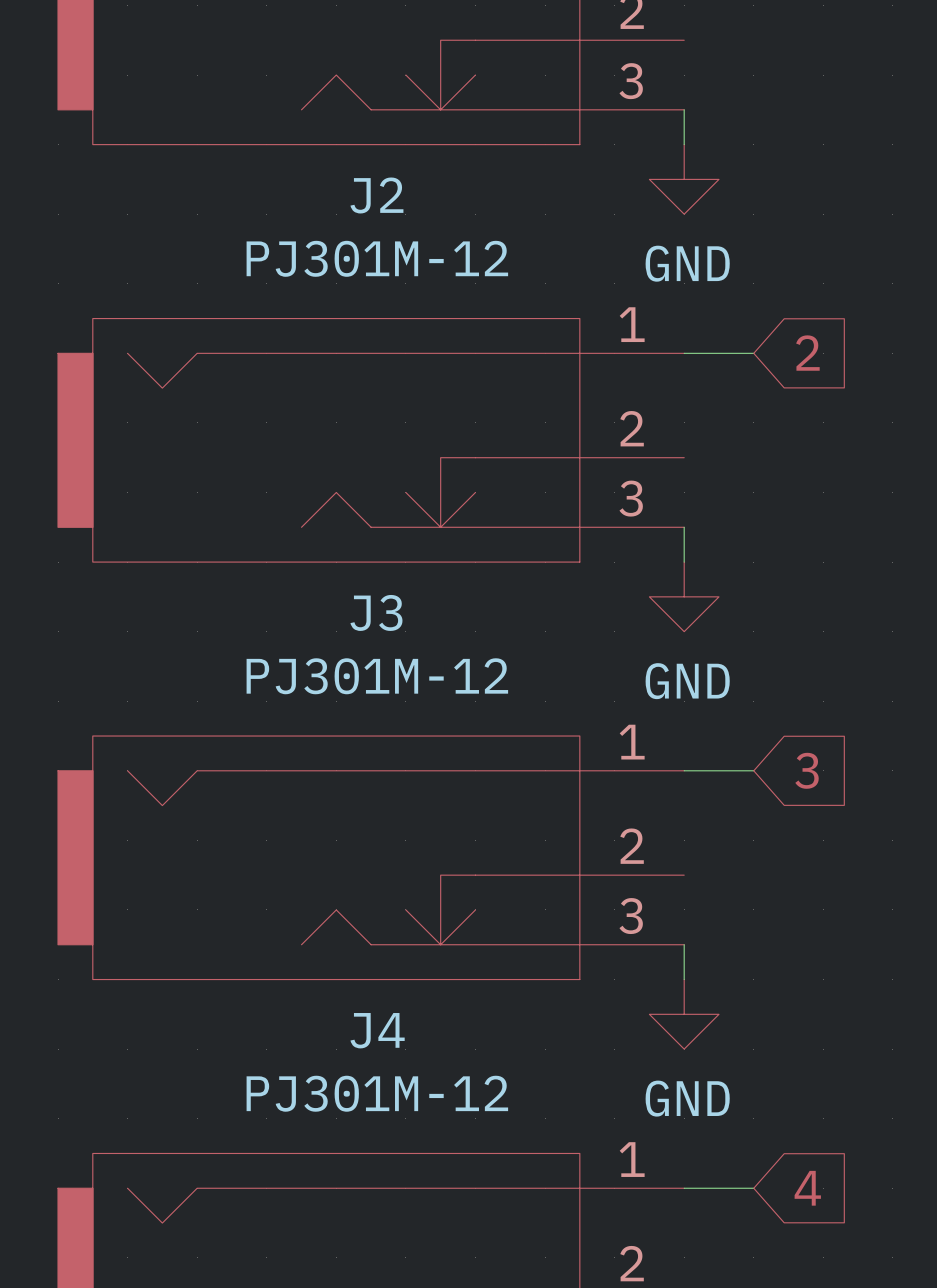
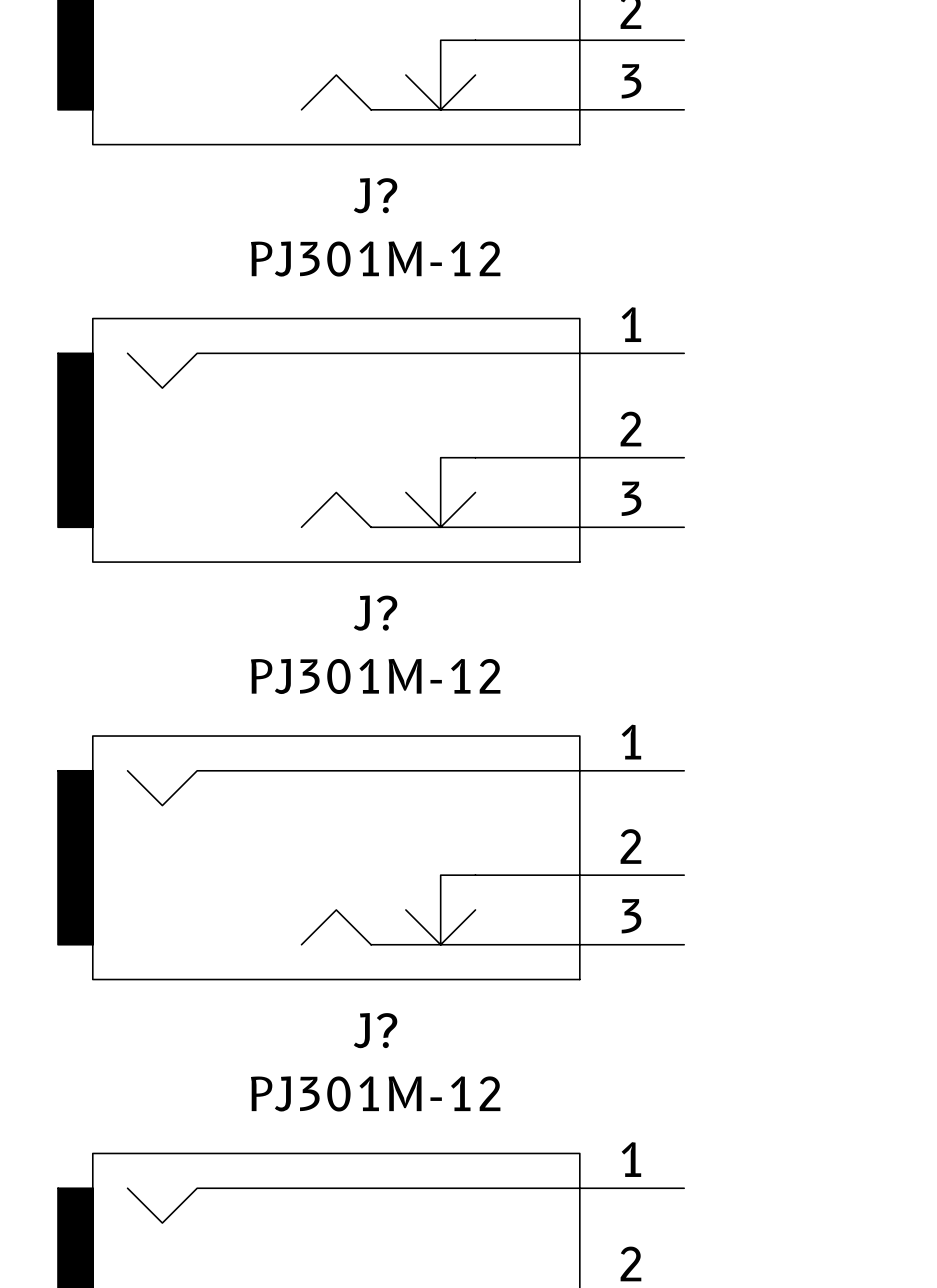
wire: (684, 109) (684, 144) -> none
power symbol: GND (684, 179) -> none
J2 name: J2 (376, 195) -> J? (375, 195)
wire: (684, 353) (753, 353) -> none
global label: 2 (807, 353) -> none
wire: (684, 527) (684, 562) -> none
power symbol: GND (684, 596) -> none
J3 name: J3 (376, 612) -> J? (375, 613)
wire: (684, 770) (753, 770) -> none
global label: 3 (807, 770) -> none
wire: (684, 944) (684, 979) -> none
power symbol: GND (684, 1014) -> none
J4 name: J4 (377, 1030) -> J? (375, 1030)
wire: (684, 1188) (753, 1188) -> none
global label: 4 (807, 1188) -> none

